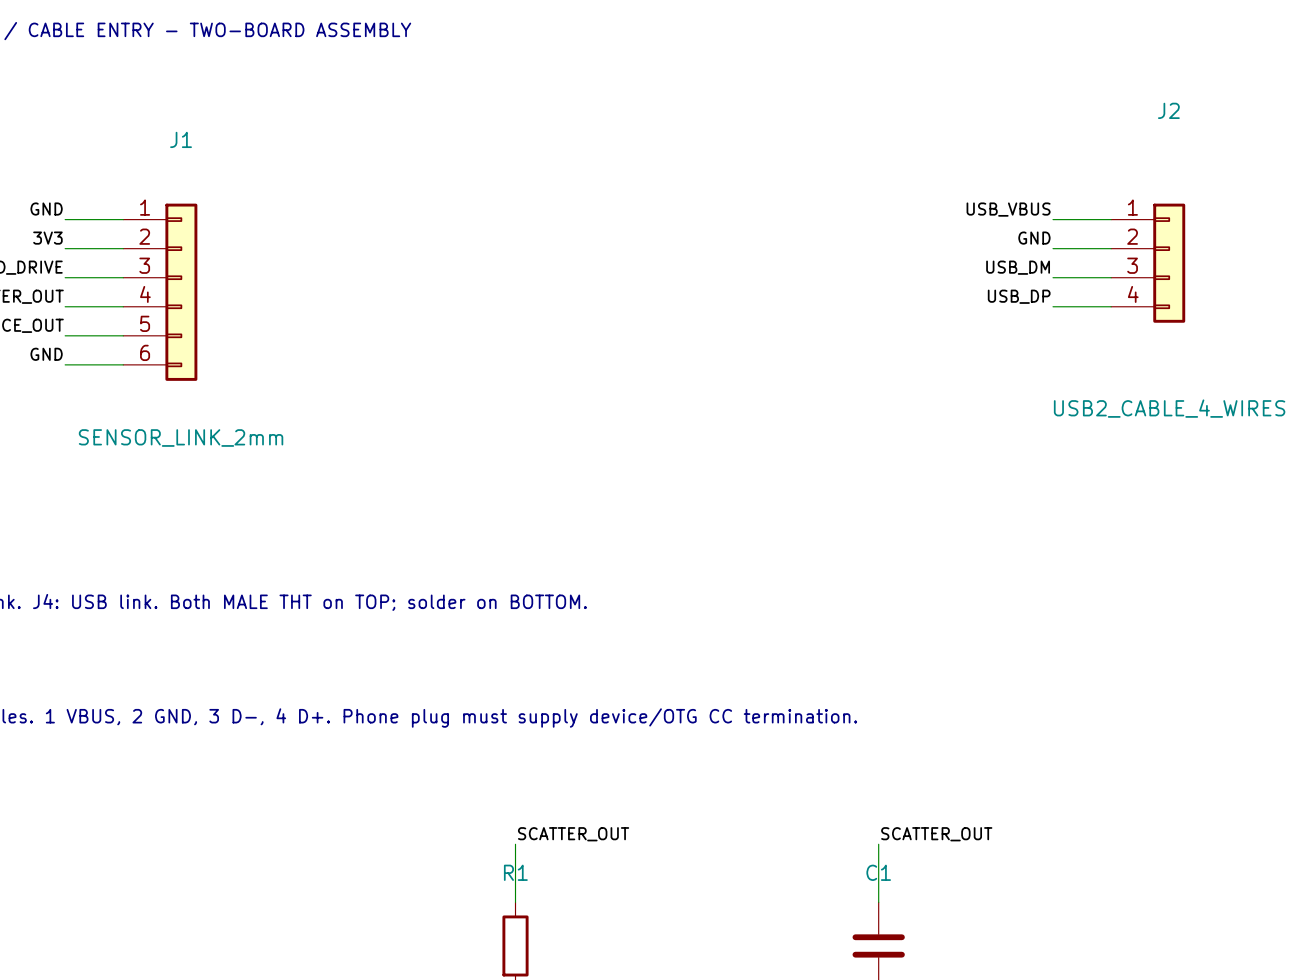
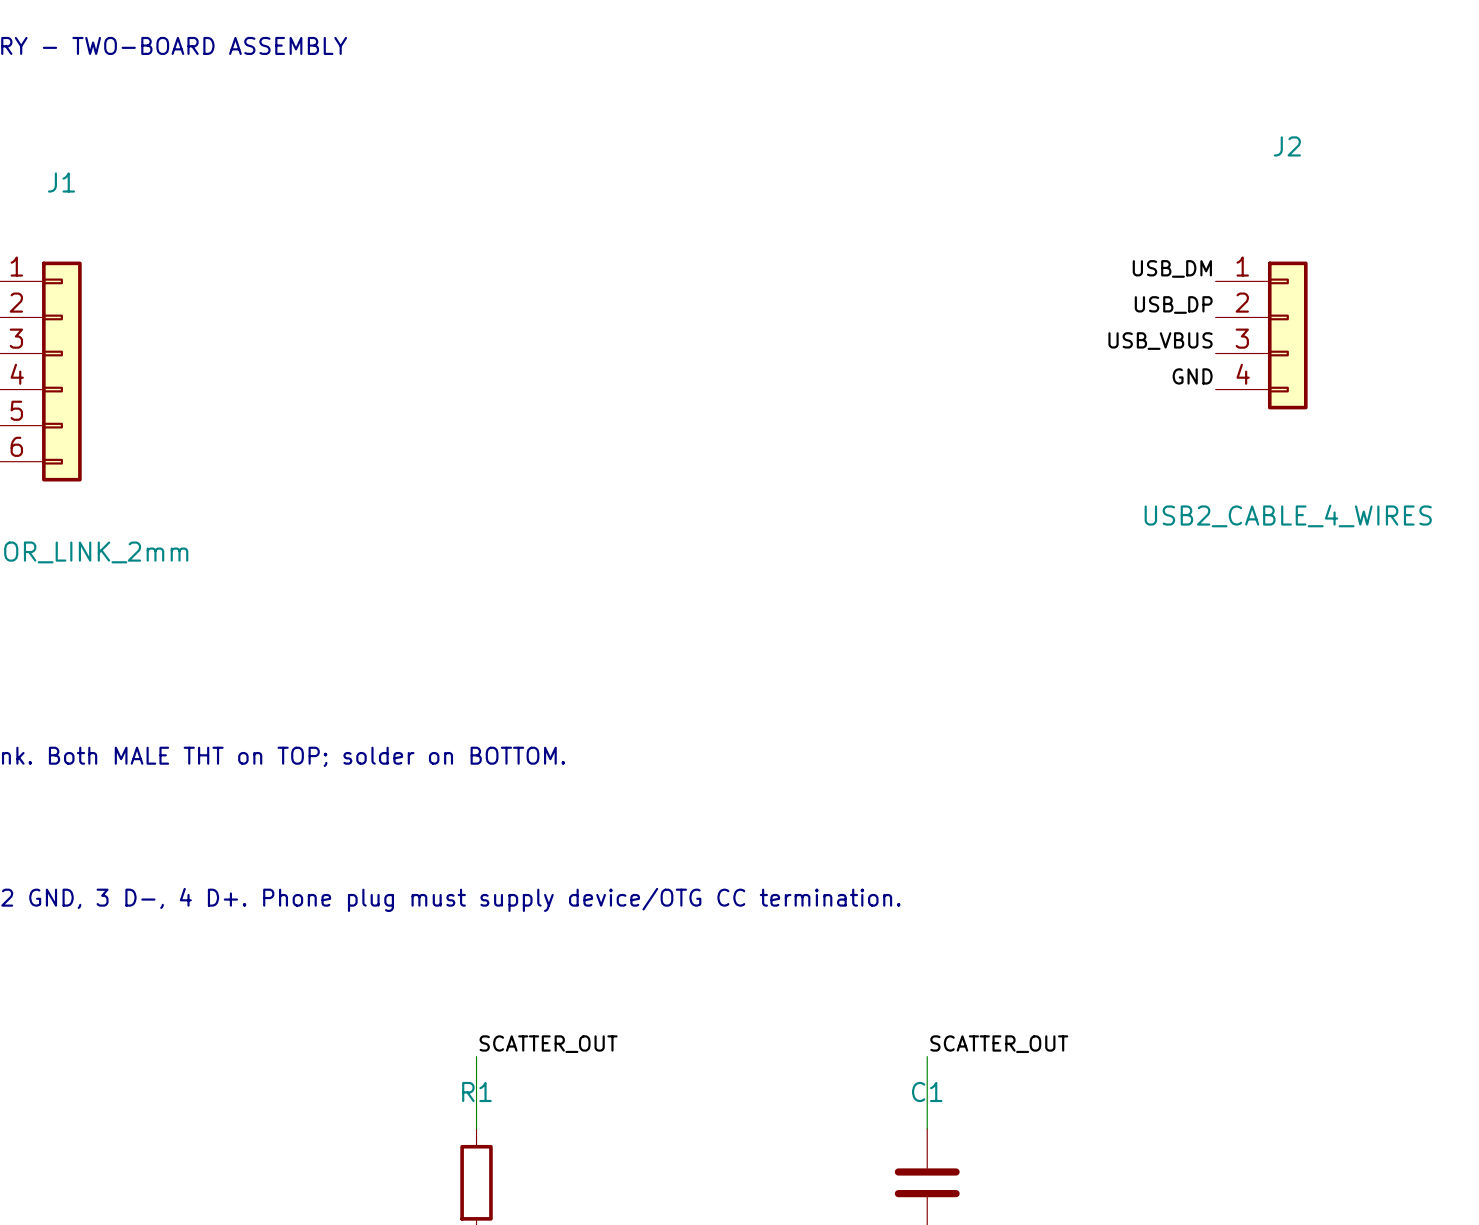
label position: USB_VBUS (1008, 209) -> USB_VBUS (1160, 341)
wire: (1053, 219) (1111, 219) -> none
label position: GND (1034, 238) -> GND (1192, 376)
wire: (1053, 248) (1111, 248) -> none
label position: USB_DM (1018, 267) -> USB_DM (1172, 268)
wire: (1053, 277) (1111, 277) -> none
label position: USB_DP (1019, 296) -> USB_DP (1173, 305)
wire: (1053, 306) (1111, 306) -> none

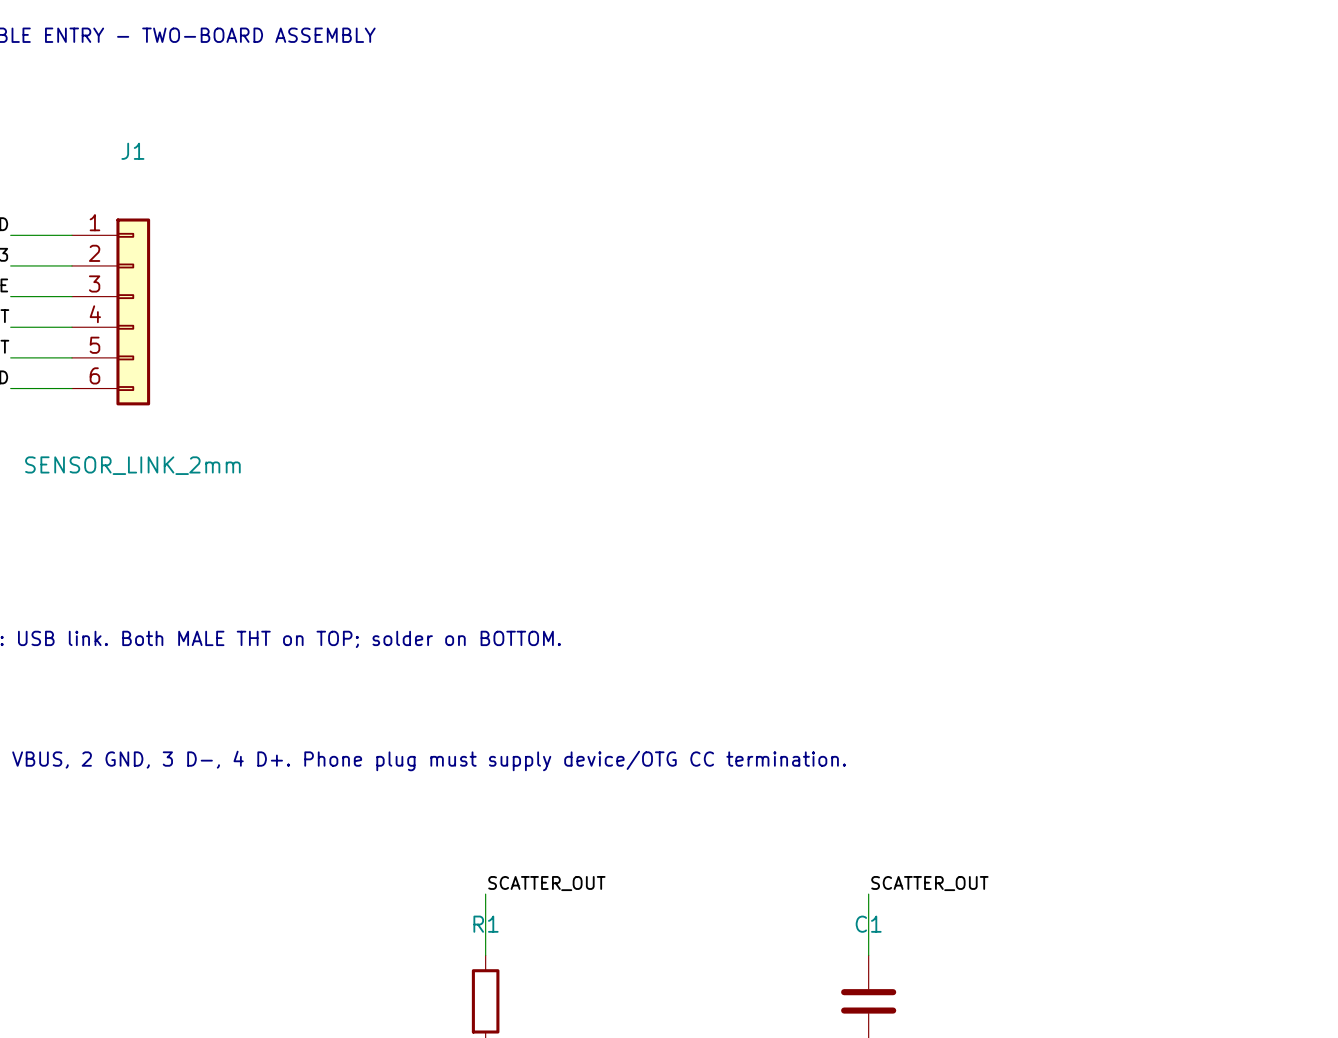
label: USB_DM (1172, 268) -> none
label: USB_DP (1173, 305) -> none
J2: USB2_CABLE_4_WIRES (1261, 335) -> none
label: USB_VBUS (1160, 341) -> none
label: GND (1192, 376) -> none

